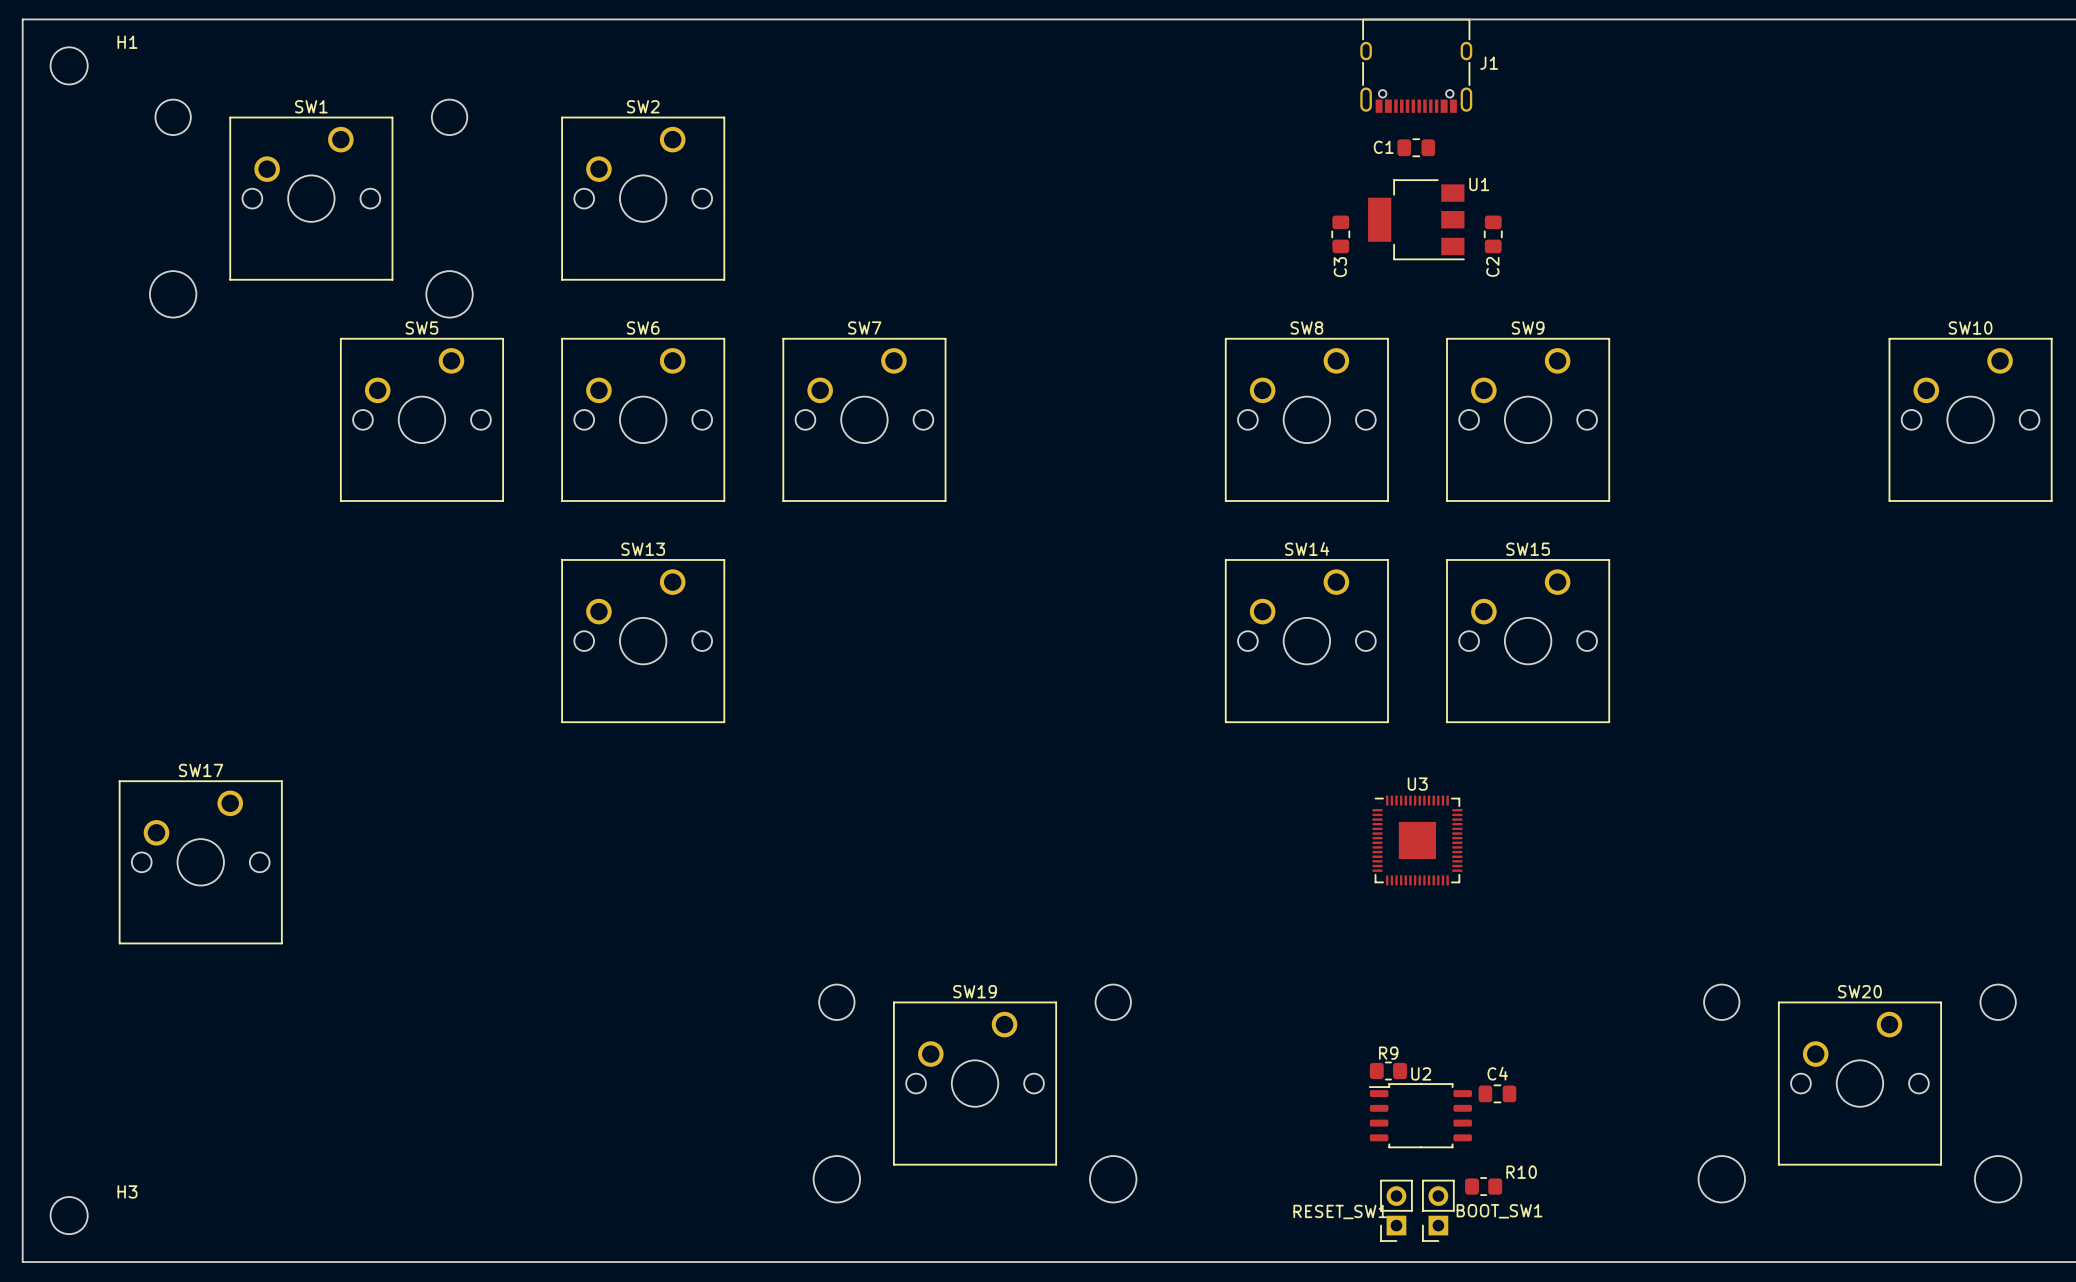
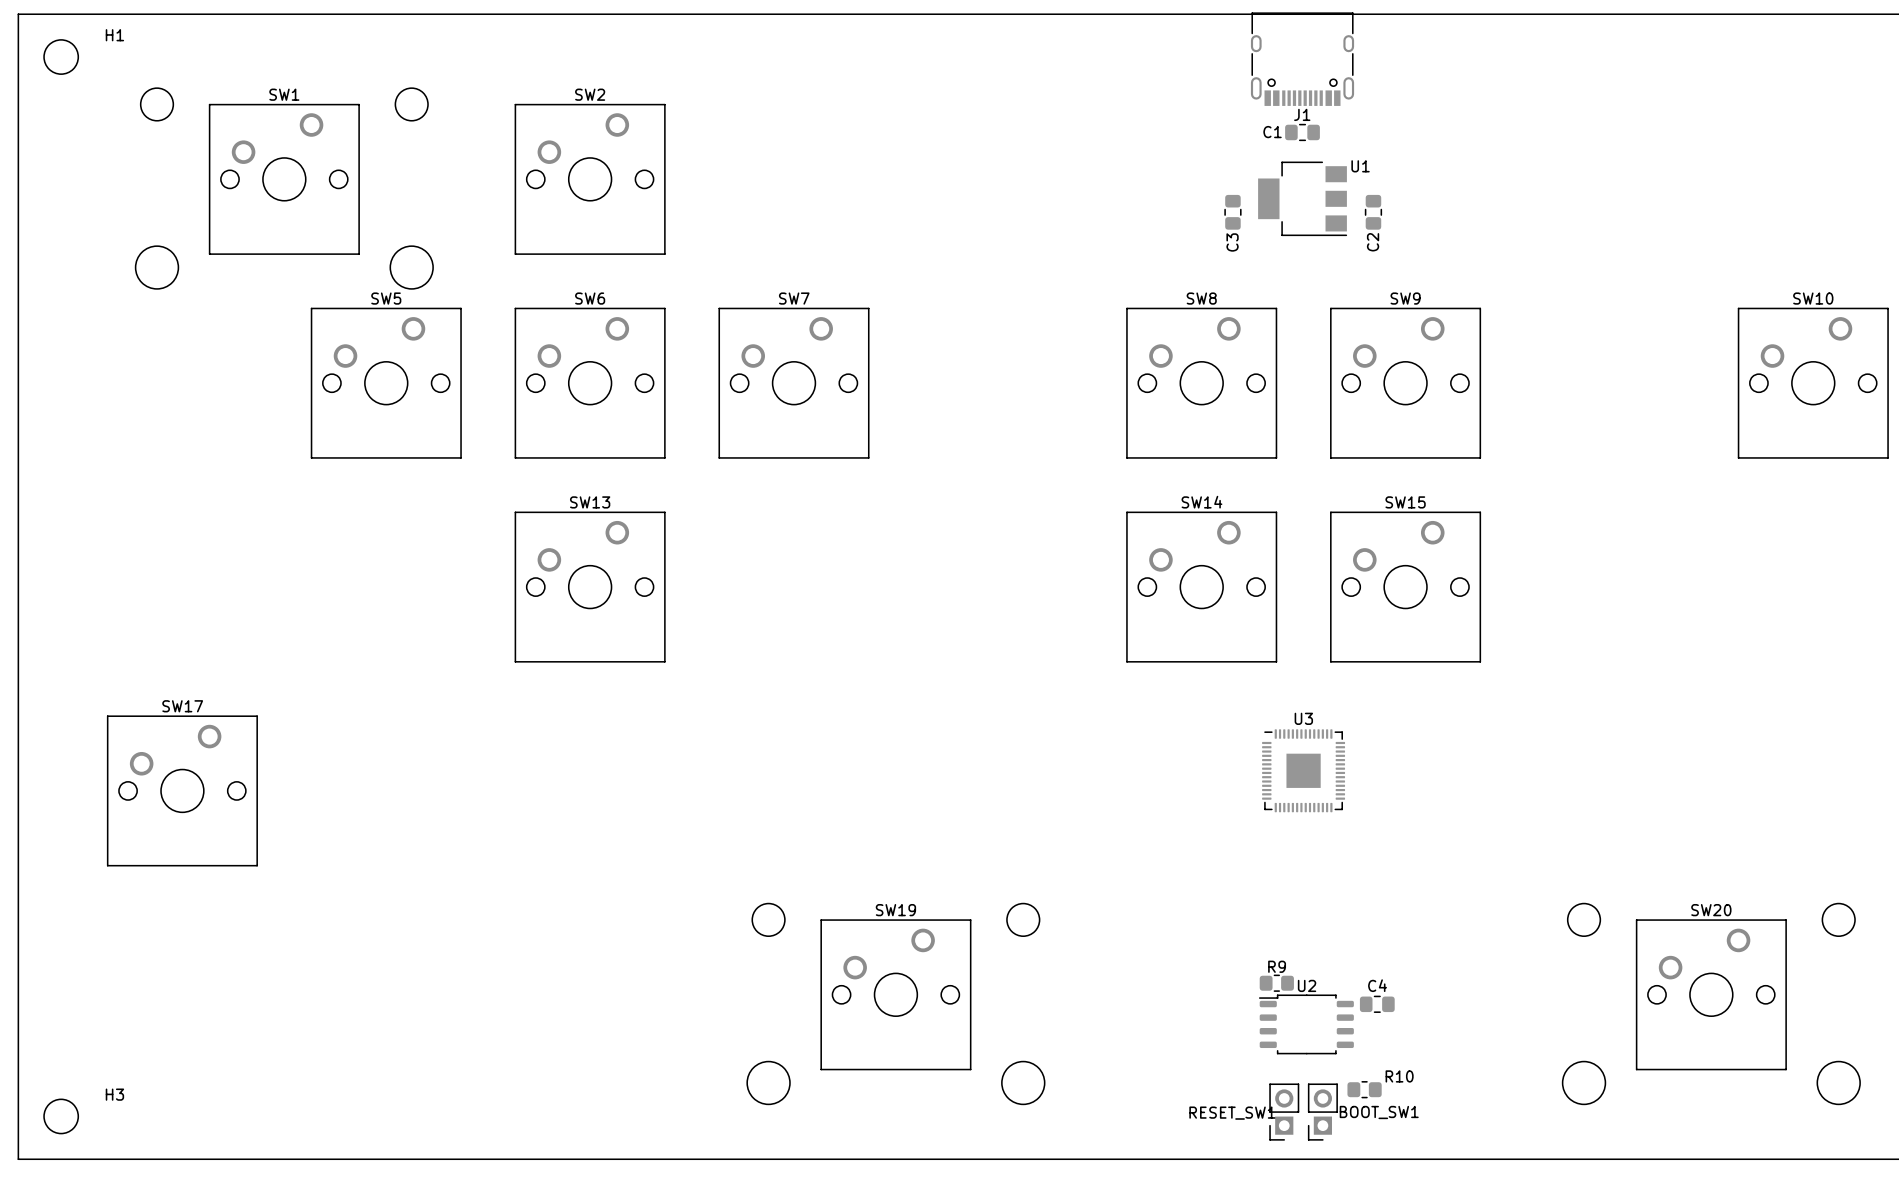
J1 footprint: [1360, 18, 1473, 113] -> [1250, 12, 1355, 106]
J1 name position: J1 (1489, 63) -> J1 (1302, 114)

